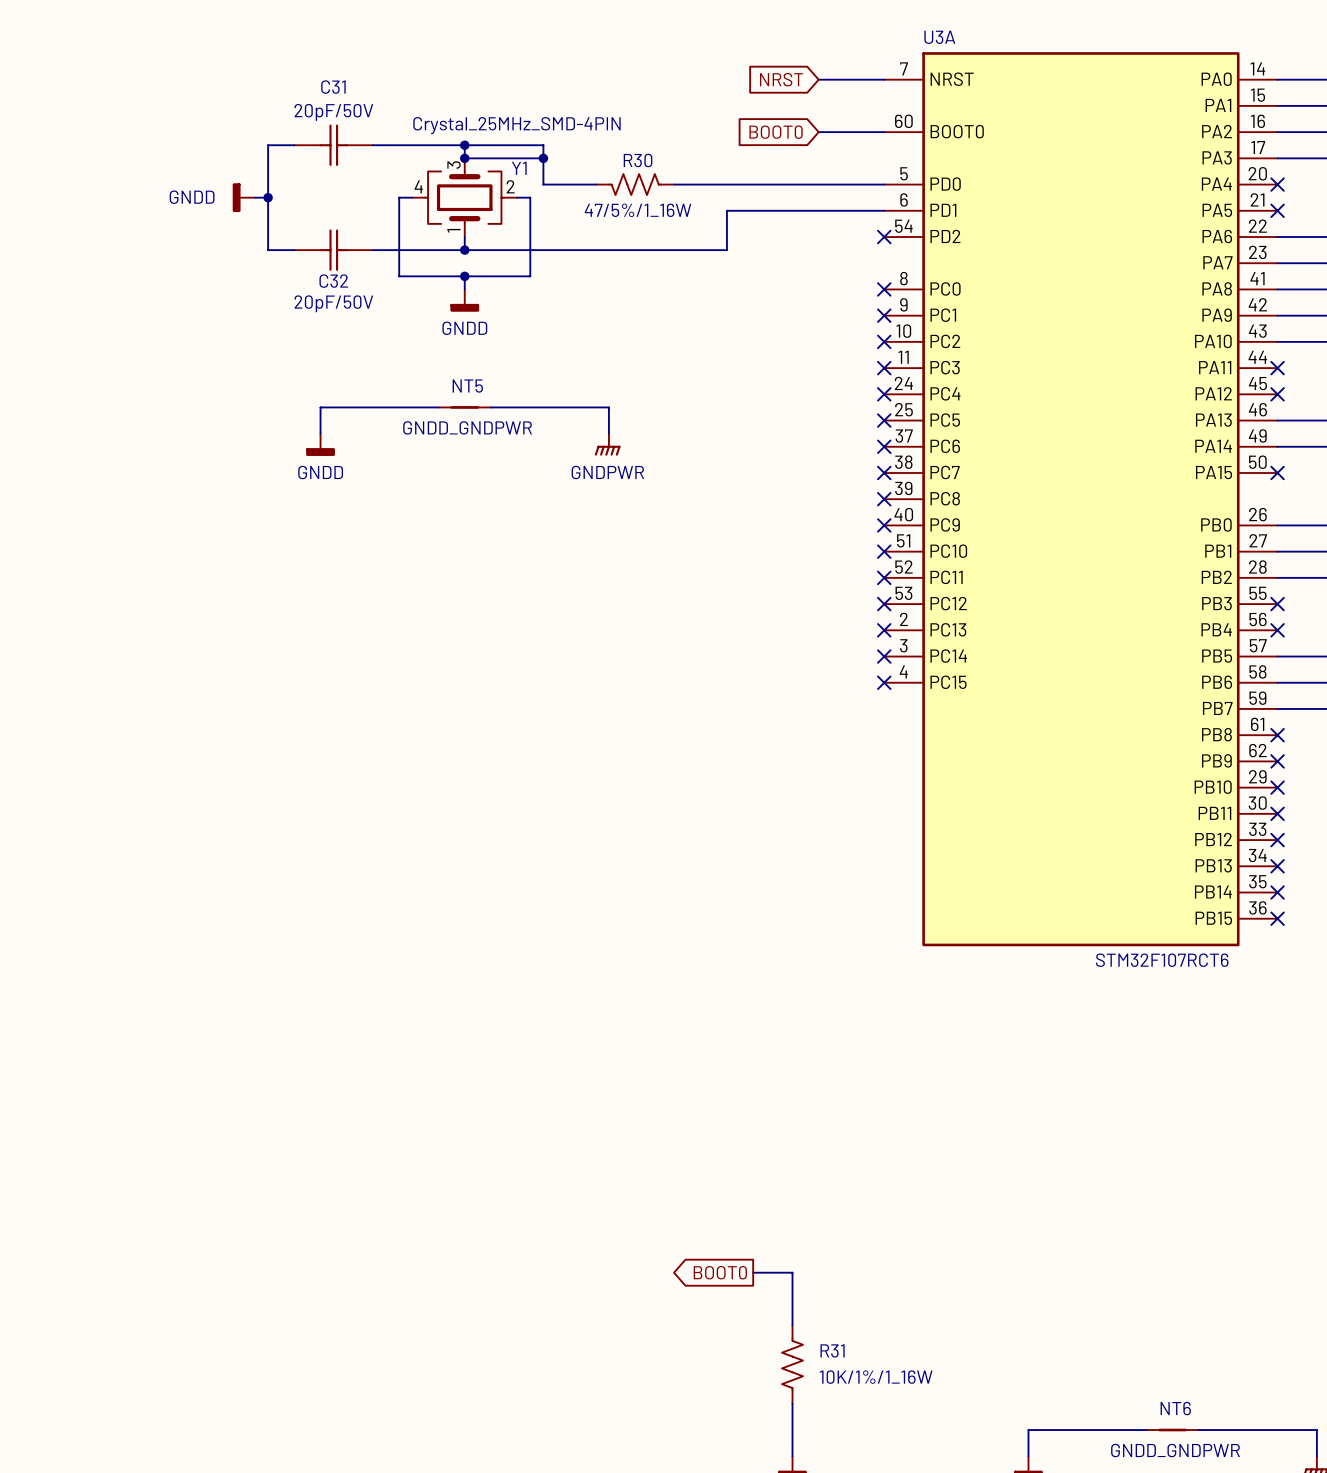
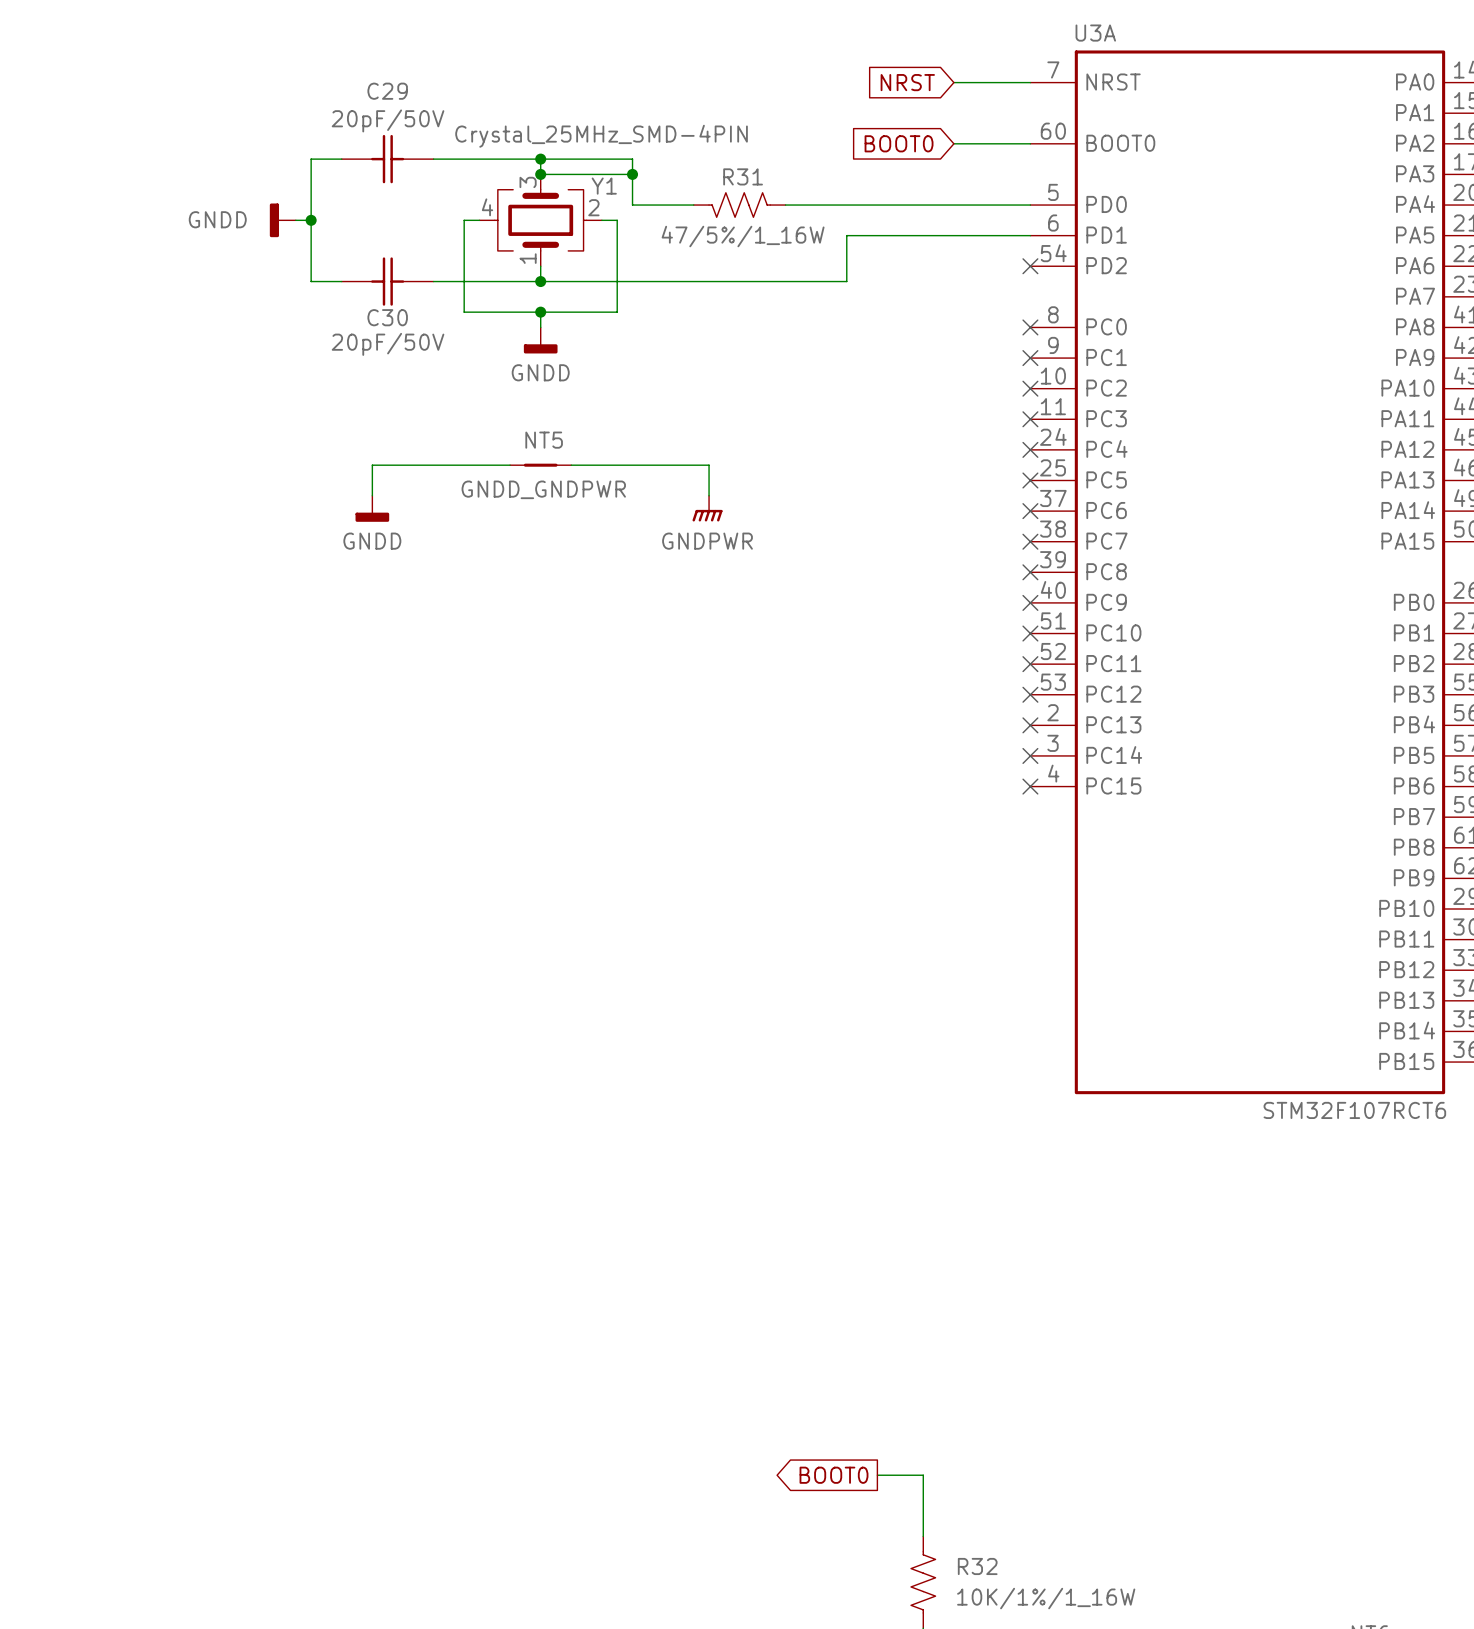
C31 name: C31 (333, 87) -> C29 (387, 91)
R30 name: R30 (638, 160) -> R31 (743, 176)
C32 name: C32 (333, 281) -> C30 (387, 317)
R31 name: R31 (832, 1350) -> R32 (977, 1566)

